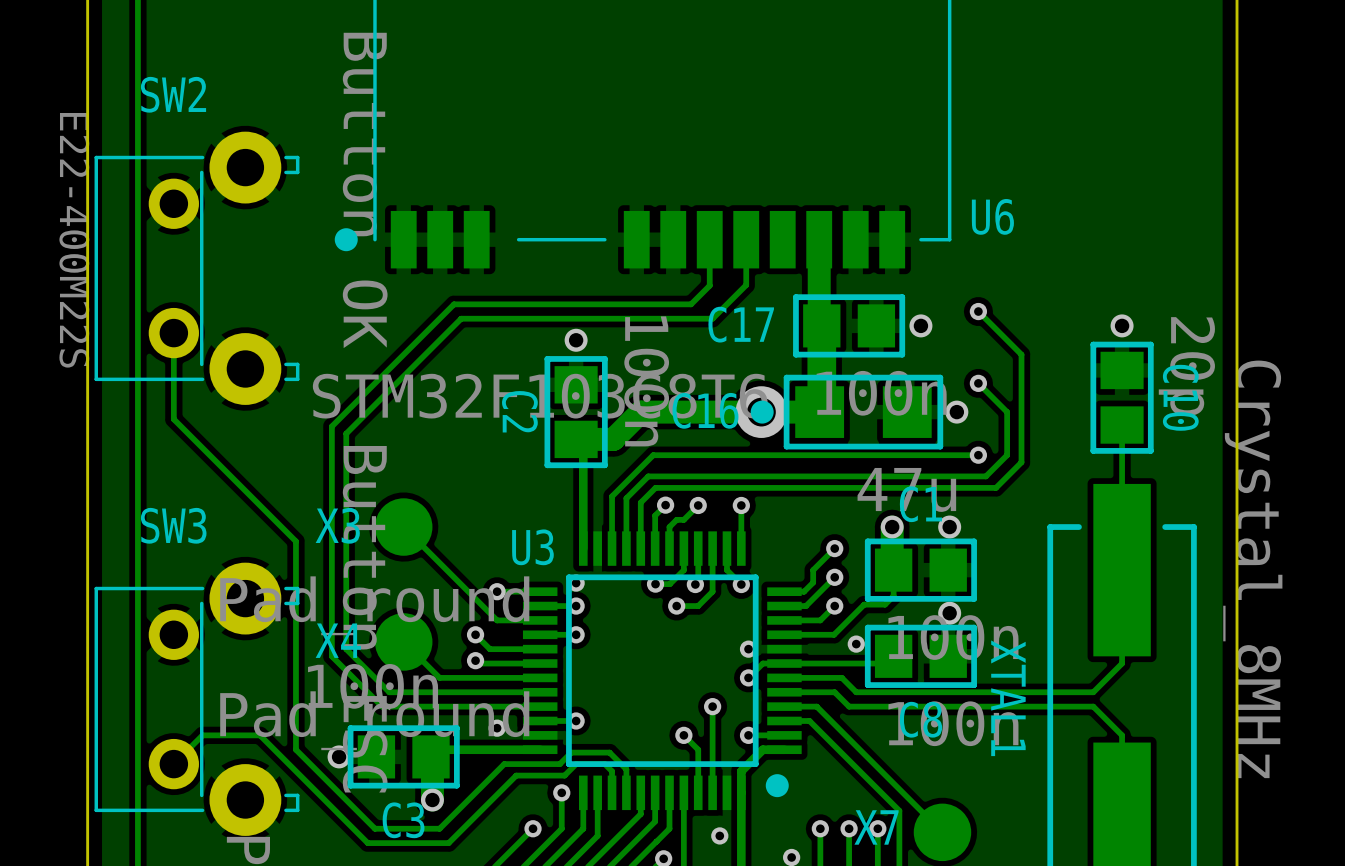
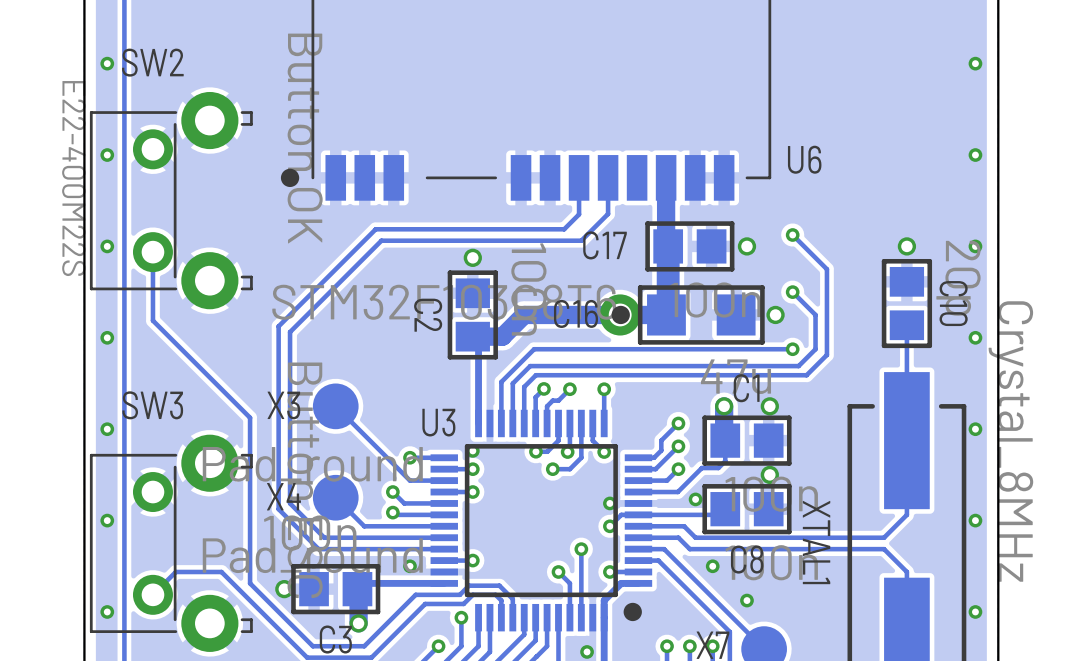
via: none -> (107, 63)
via: none -> (975, 63)
via: none -> (107, 155)
via: none -> (975, 155)
via: none -> (107, 246)
via: none -> (975, 246)
via: none -> (107, 337)
via: none -> (975, 337)
via: none -> (107, 429)
via: none -> (975, 429)
via: none -> (107, 520)
via: none -> (975, 520)
via: none -> (712, 566)
via: none -> (746, 600)
via: none -> (107, 611)
via: none -> (975, 611)

